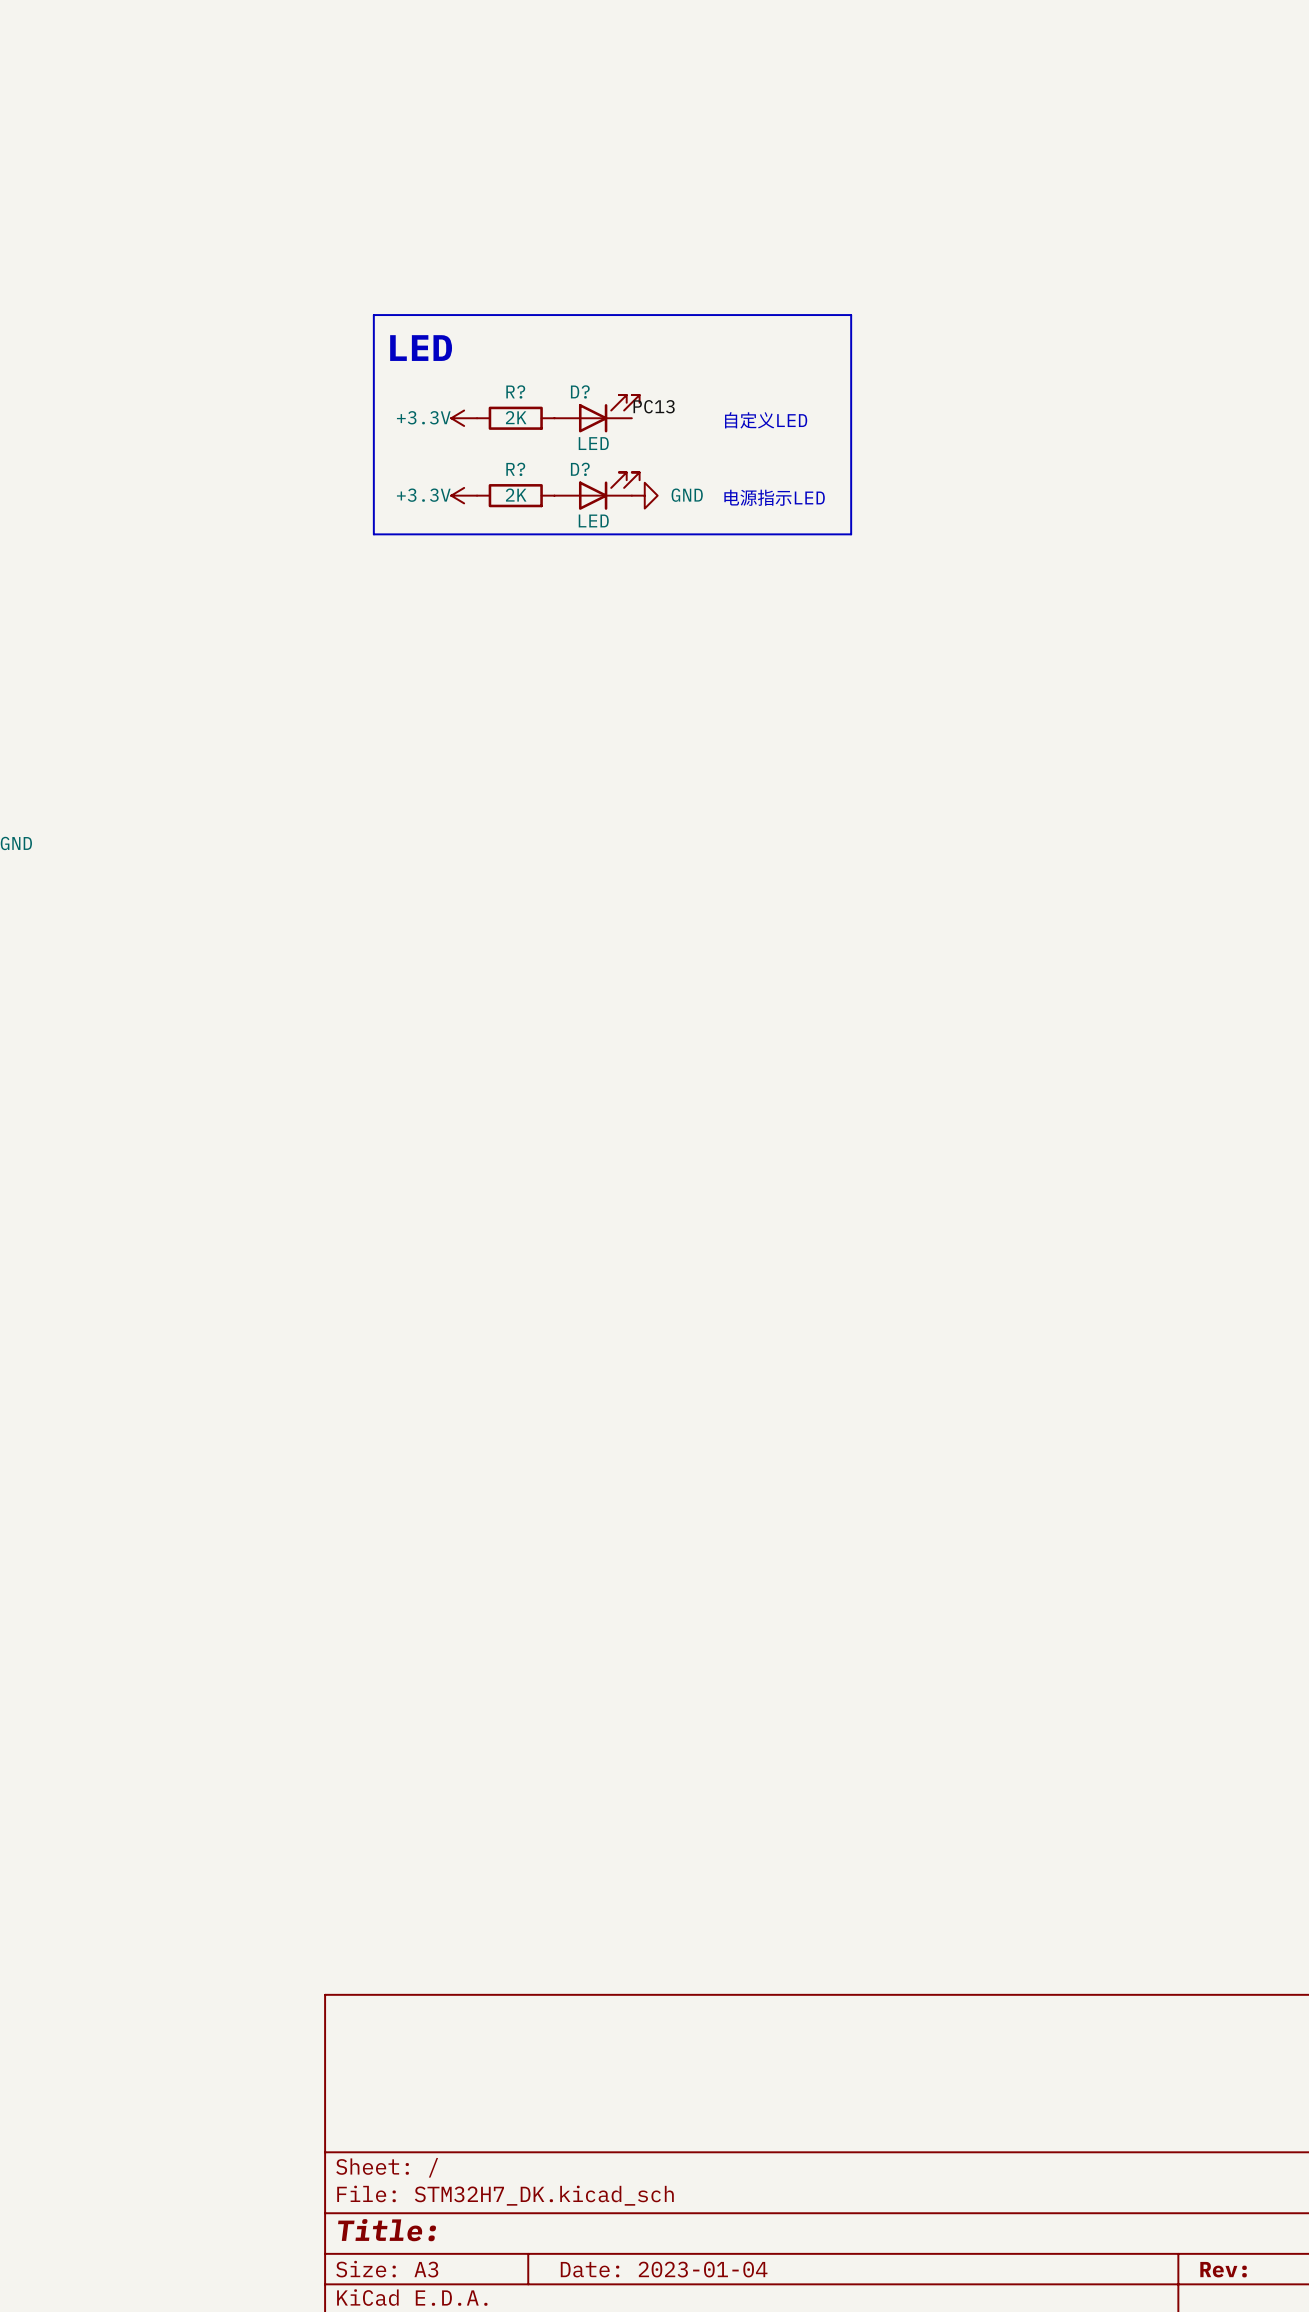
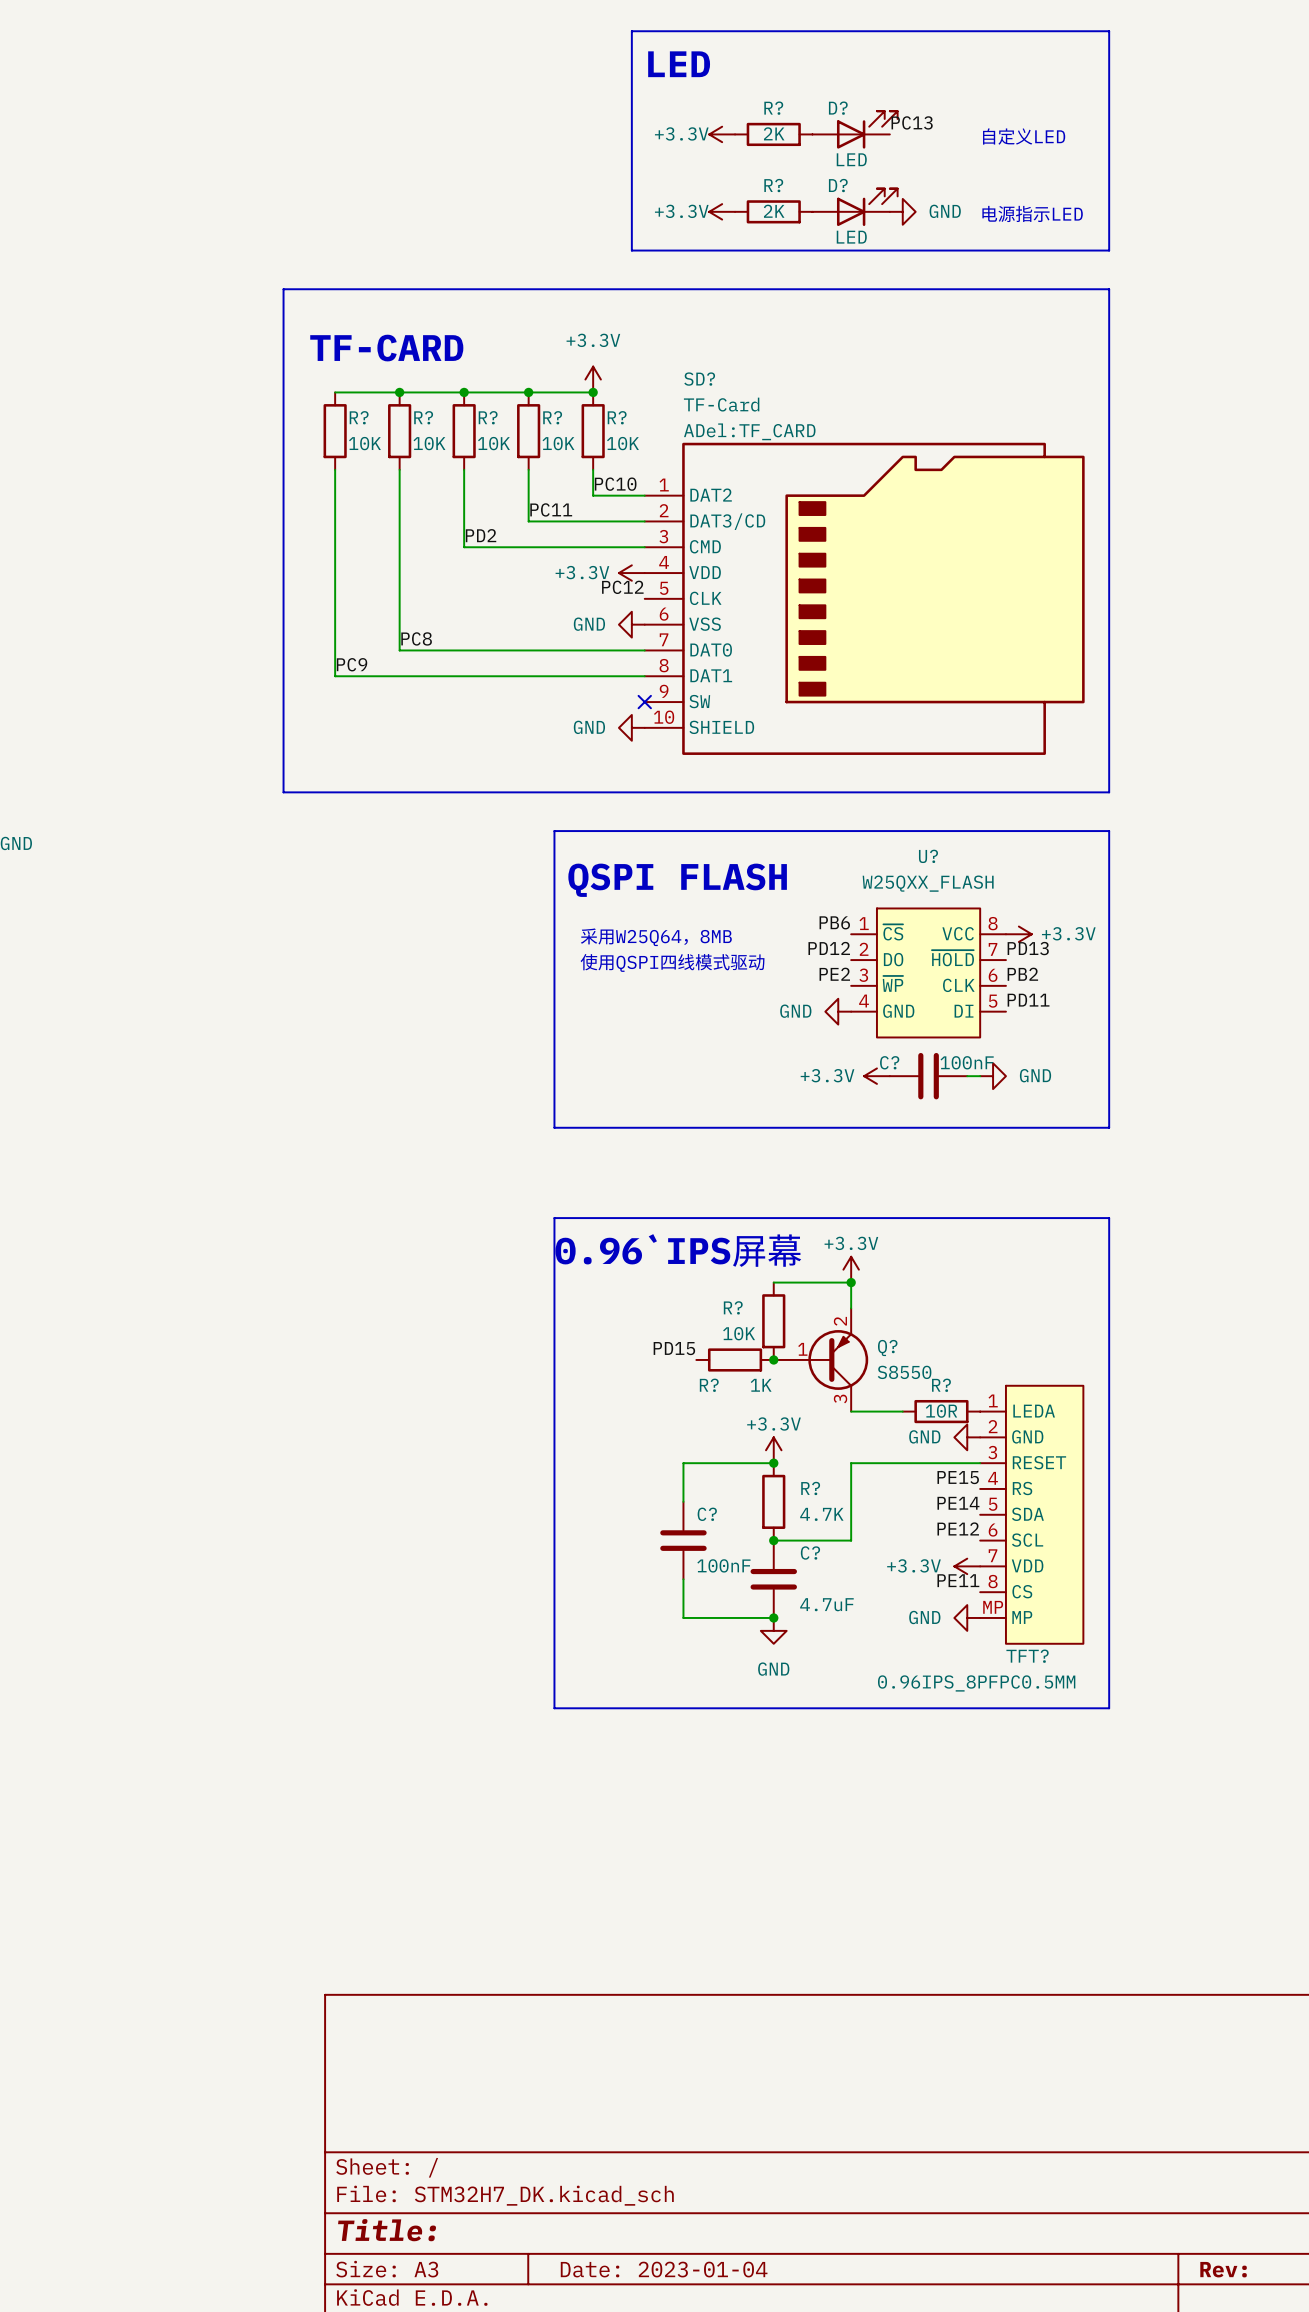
line: none -> (631, 31) (1109, 31) (1109, 250) (631, 250) (631, 31)
text: none -> LED (679, 64)
label: none -> PC13 (912, 122)
D?: none -> LED (855, 129)
power symbol: none -> +3.3V (722, 134)
R?: none -> 2K (773, 134)
text: none -> 自定义LED (1024, 136)
D?: none -> LED (855, 207)
power symbol: none -> +3.3V (722, 211)
R?: none -> 2K (773, 211)
power symbol: none -> GND (902, 211)
text: none -> 电源指示LED (1032, 213)
line: none -> (283, 289) (283, 792) (1109, 792) (1109, 289) (283, 289)
line: (373, 315) (851, 315) (851, 534) (373, 534) (373, 315) -> none
text: none -> TF-CARD (386, 348)
text: LED (421, 348) -> none
power symbol: none -> +3.3V (593, 379)
wire: none -> (335, 392) (593, 392)
junction: none -> (399, 392)
junction: none -> (464, 392)
junction: none -> (528, 392)
junction: none -> (593, 392)
label: PC13 (654, 406) -> none
D?: LED (597, 413) -> none
power symbol: +3.3V (464, 418) -> none
R?: 2K (515, 418) -> none
text: 自定义LED (766, 420) -> none
R?: none -> 10K (335, 431)
R?: none -> 10K (399, 431)
R?: none -> 10K (464, 431)
R?: none -> 10K (528, 431)
R?: none -> 10K (593, 431)
wire: none -> (335, 469) (335, 676) (644, 676)
wire: none -> (399, 469) (399, 650) (644, 650)
wire: none -> (464, 469) (464, 547) (644, 547)
wire: none -> (528, 469) (528, 521) (644, 521)
label: none -> PC10 (615, 484)
D?: LED (597, 491) -> none
power symbol: +3.3V (464, 495) -> none
R?: 2K (515, 495) -> none
power symbol: GND (644, 495) -> none
text: 电源指示LED (774, 497) -> none
label: none -> PC11 (551, 509)
label: none -> PD2 (481, 535)
power symbol: none -> +3.3V (631, 573)
label: none -> PC12 (622, 587)
SD?: none -> TF-Card (864, 598)
power symbol: none -> GND (631, 624)
label: none -> PC8 (416, 638)
label: none -> PC9 (352, 664)
no-connect mark: none -> (644, 702)
power symbol: none -> GND (631, 727)
line: none -> (554, 831) (1109, 831) (1109, 1127) (554, 1127) (554, 831)
text: none -> QSPI FLASH (677, 880)
label: none -> PB6 (834, 922)
power symbol: none -> +3.3V (1018, 934)
text: none -> 采用W25Q64，8MB (656, 937)
label: none -> PD12 (829, 948)
label: none -> PD13 (1028, 948)
text: none -> 使用QSPI四线模式驱动 (672, 962)
U?: none -> W25QXX_FLASH (928, 972)
label: none -> PE2 (834, 974)
label: none -> PB2 (1022, 974)
label: none -> PD11 (1028, 1000)
power symbol: none -> GND (838, 1011)
power symbol: none -> +3.3V (876, 1076)
C?: none -> 100nF (928, 1076)
wire: none -> (967, 1076) (980, 1076)
power symbol: none -> GND (993, 1076)
line: none -> (554, 1218) (1109, 1218) (1109, 1708) (554, 1708) (554, 1218)
text: none -> 0.96`IPS屏幕 (678, 1250)
power symbol: none -> +3.3V (851, 1269)
wire: none -> (773, 1282) (851, 1282) (851, 1308)
junction: none -> (851, 1282)
R?: none -> 10K (773, 1321)
label: none -> PD15 (674, 1348)
R?: none -> 1K (735, 1359)
junction: none -> (773, 1359)
Q?: none -> S8550 (820, 1359)
wire: none -> (851, 1411) (902, 1411)
R?: none -> 10R (941, 1411)
power symbol: none -> GND (967, 1437)
power symbol: none -> +3.3V (773, 1450)
wire: none -> (773, 1463) (683, 1463) (683, 1501)
junction: none -> (773, 1463)
wire: none -> (980, 1463) (851, 1463) (851, 1540) (773, 1540)
label: none -> PE15 (958, 1477)
R?: none -> 4.7K (773, 1501)
label: none -> PE14 (958, 1503)
TFT?: none -> 0.96IPS_8PFPC0.5MM (1031, 1514)
label: none -> PE12 (958, 1528)
C?: none -> 100nF (683, 1540)
junction: none -> (773, 1540)
power symbol: none -> +3.3V (967, 1566)
wire: none -> (683, 1579) (683, 1617) (773, 1617)
C?: none -> 4.7uF (773, 1579)
label: none -> PE11 (958, 1580)
junction: none -> (773, 1617)
power symbol: none -> GND (967, 1617)
power symbol: none -> GND (773, 1630)

